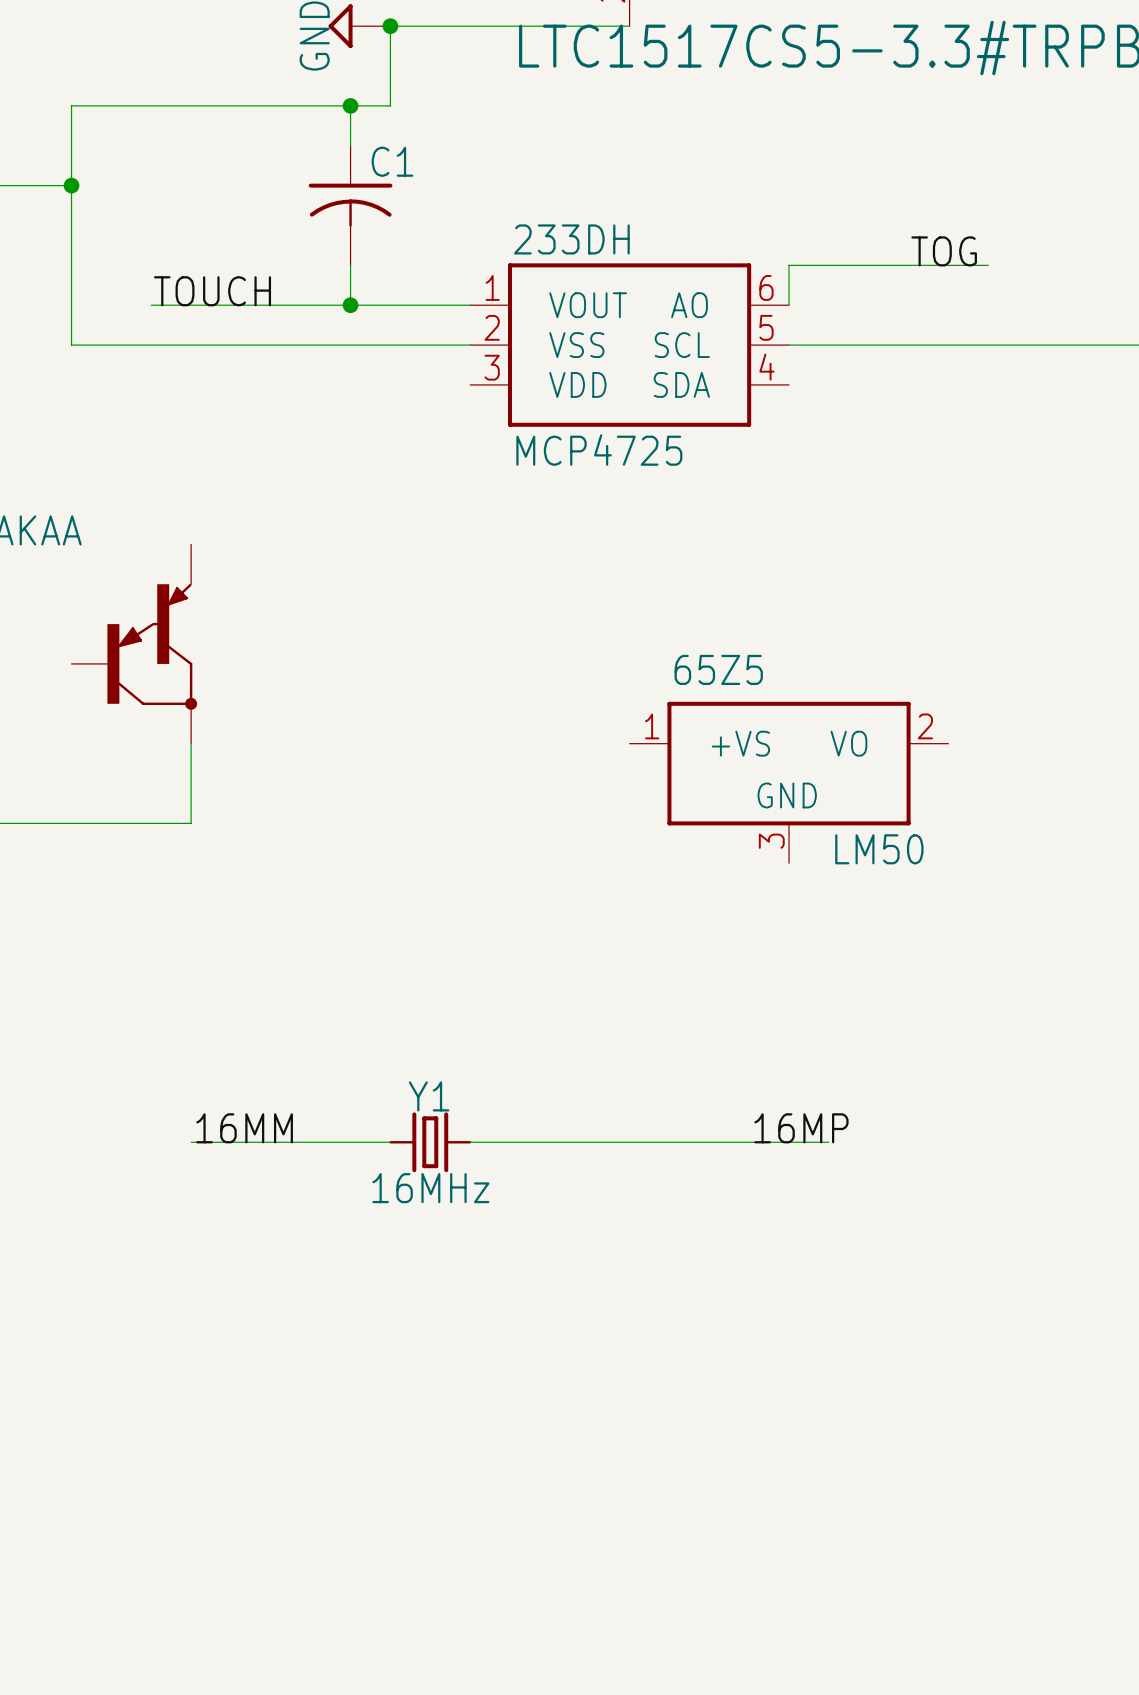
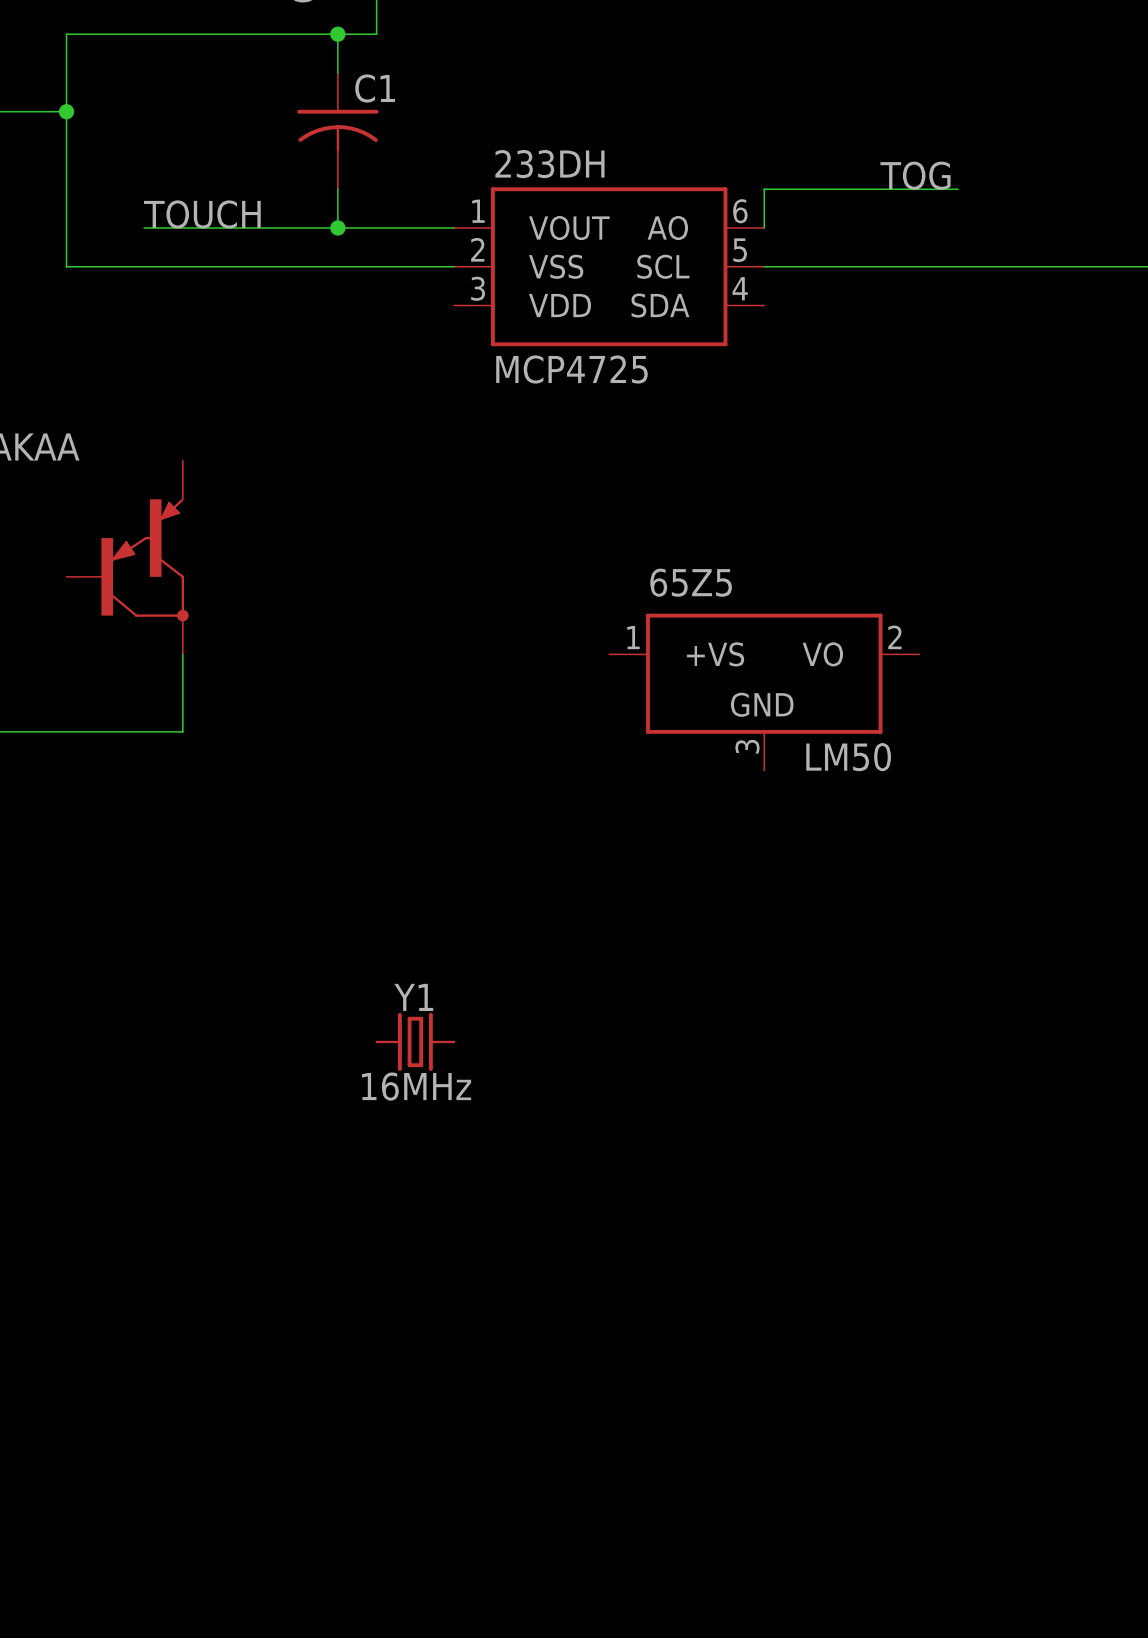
label: 16MM (244, 1128) -> none
label: 16MP (801, 1128) -> none
wire: (191, 1142) (390, 1142) -> none
wire: (470, 1142) (828, 1142) -> none

